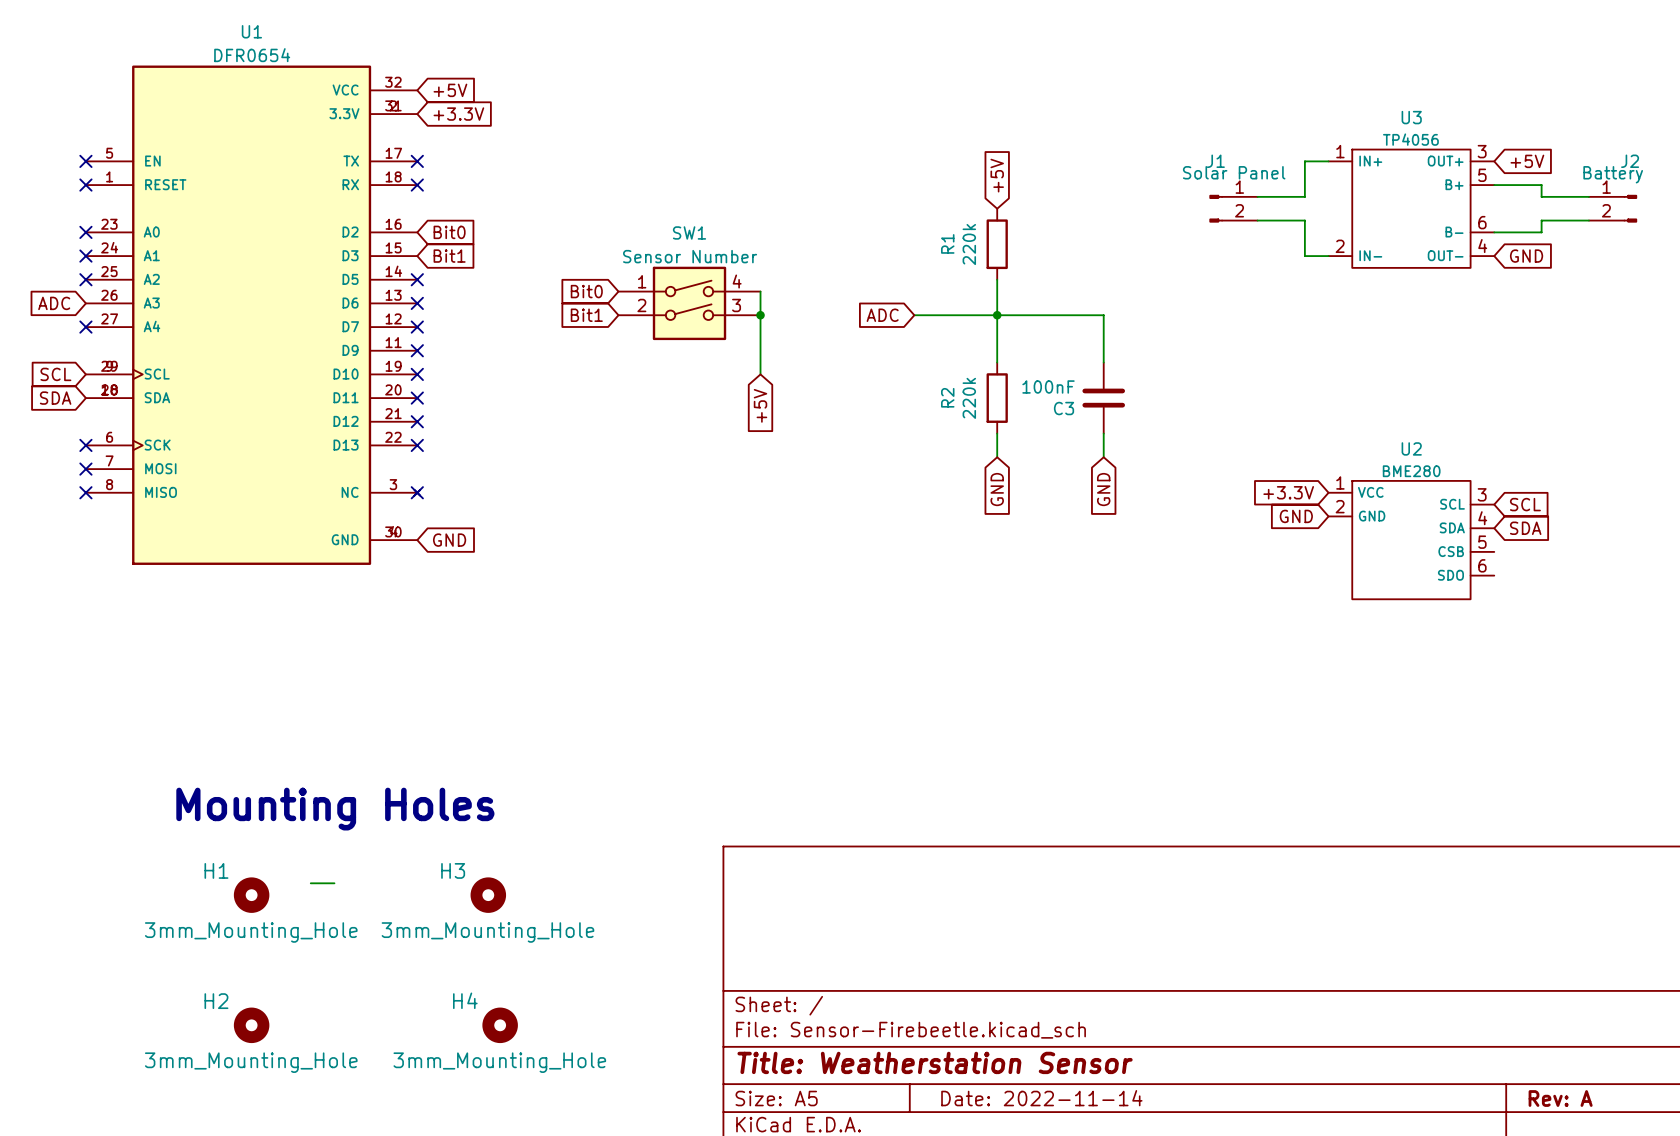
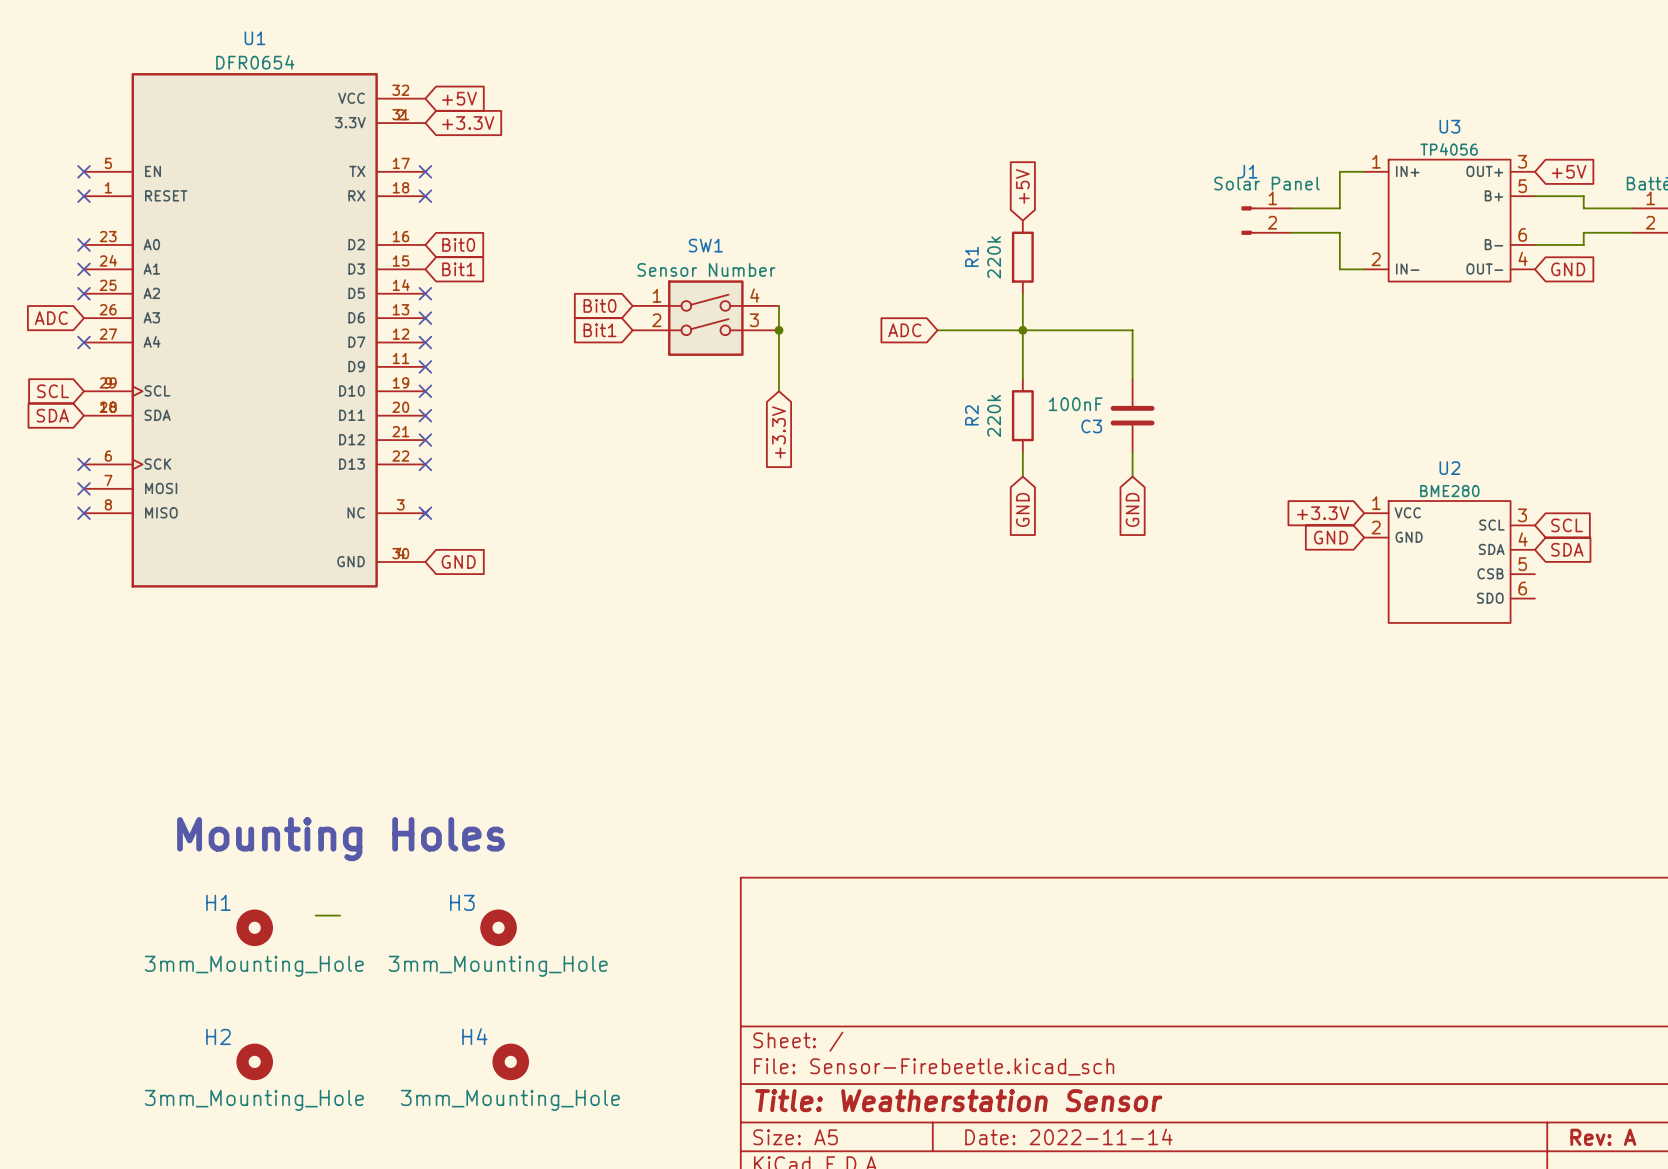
global label: +5V (760, 405) -> +3.3V (778, 432)

